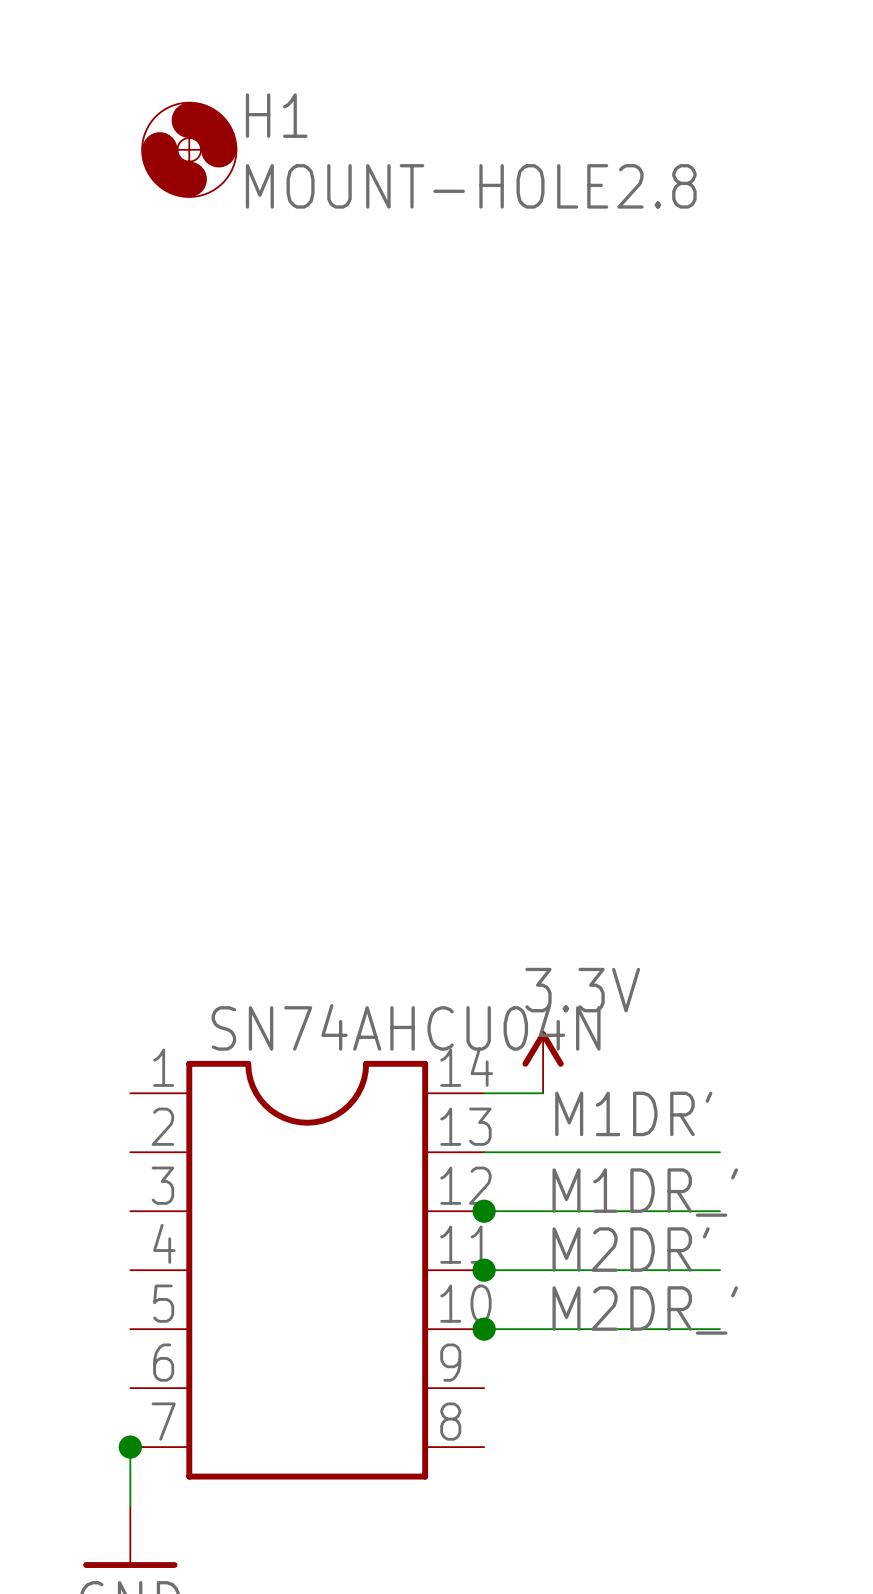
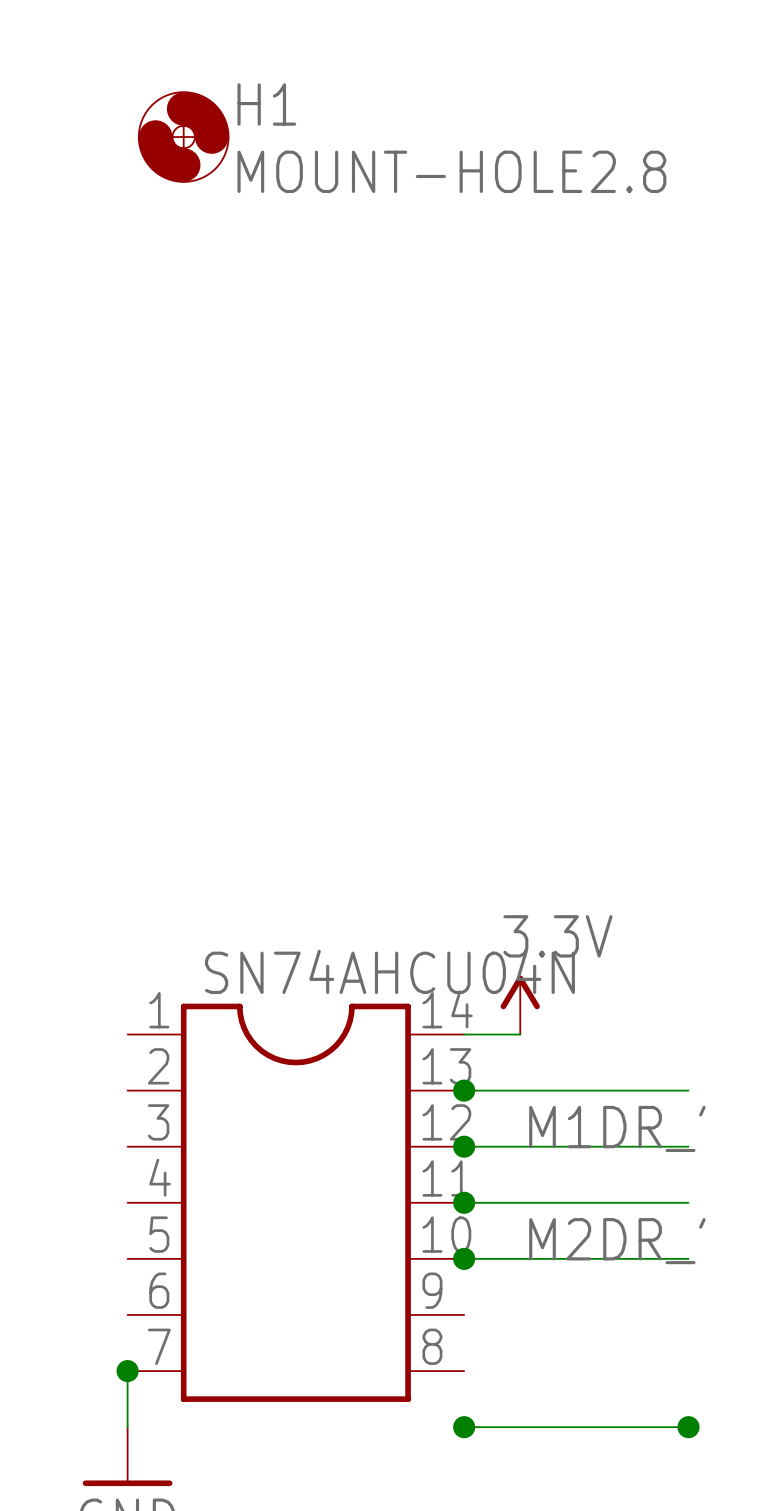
text: M1DR' (633, 1113) -> none
junction: none -> (464, 1090)
text: M2DR' (631, 1249) -> none
wire: none -> (464, 1427) (688, 1427)
junction: none -> (464, 1427)
junction: none -> (688, 1427)

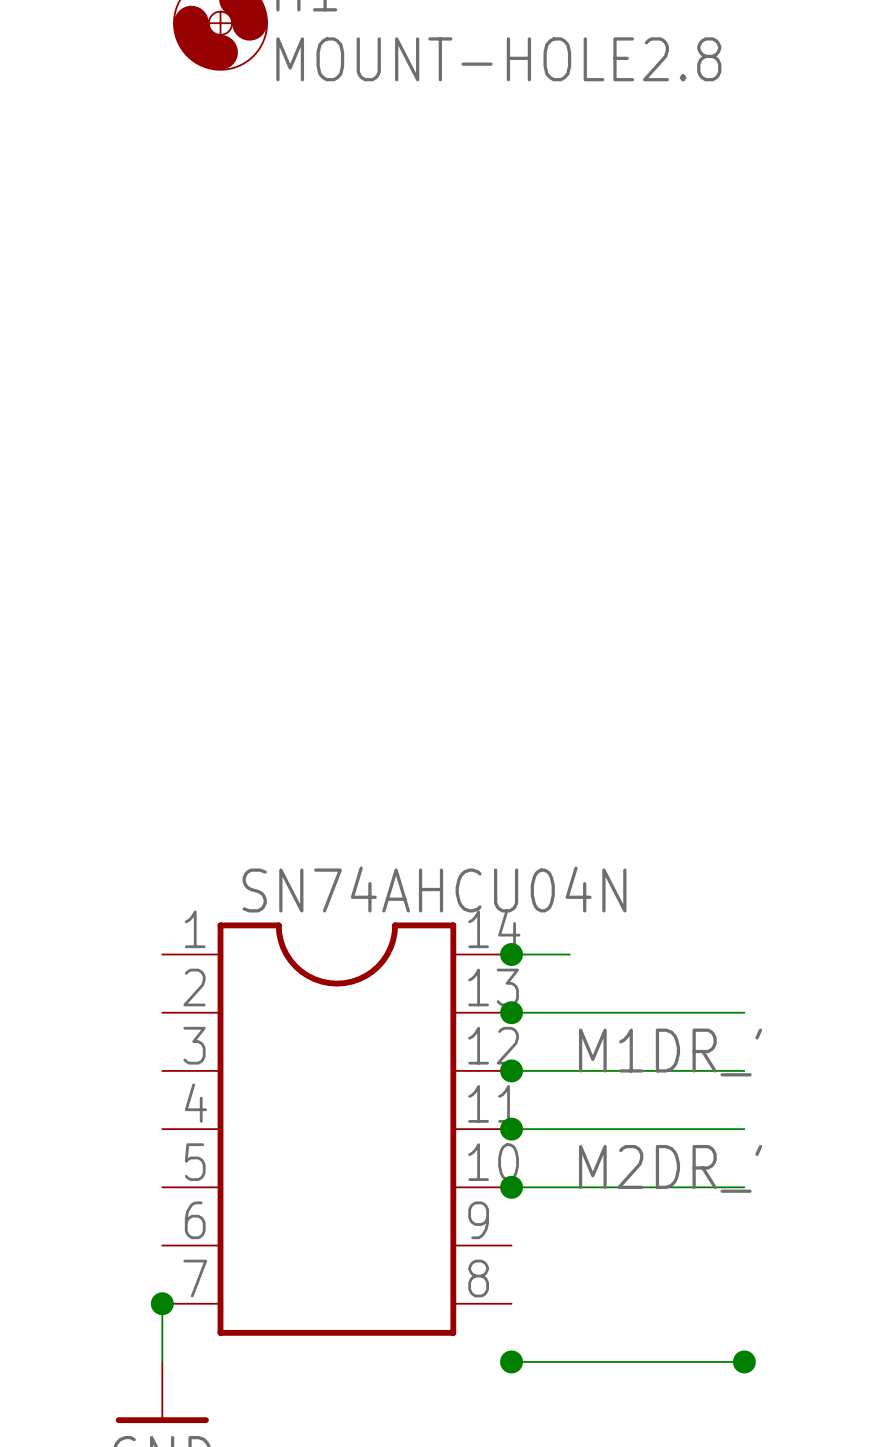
power symbol: 3.3V (520, 1005) -> none
junction: none -> (511, 954)

